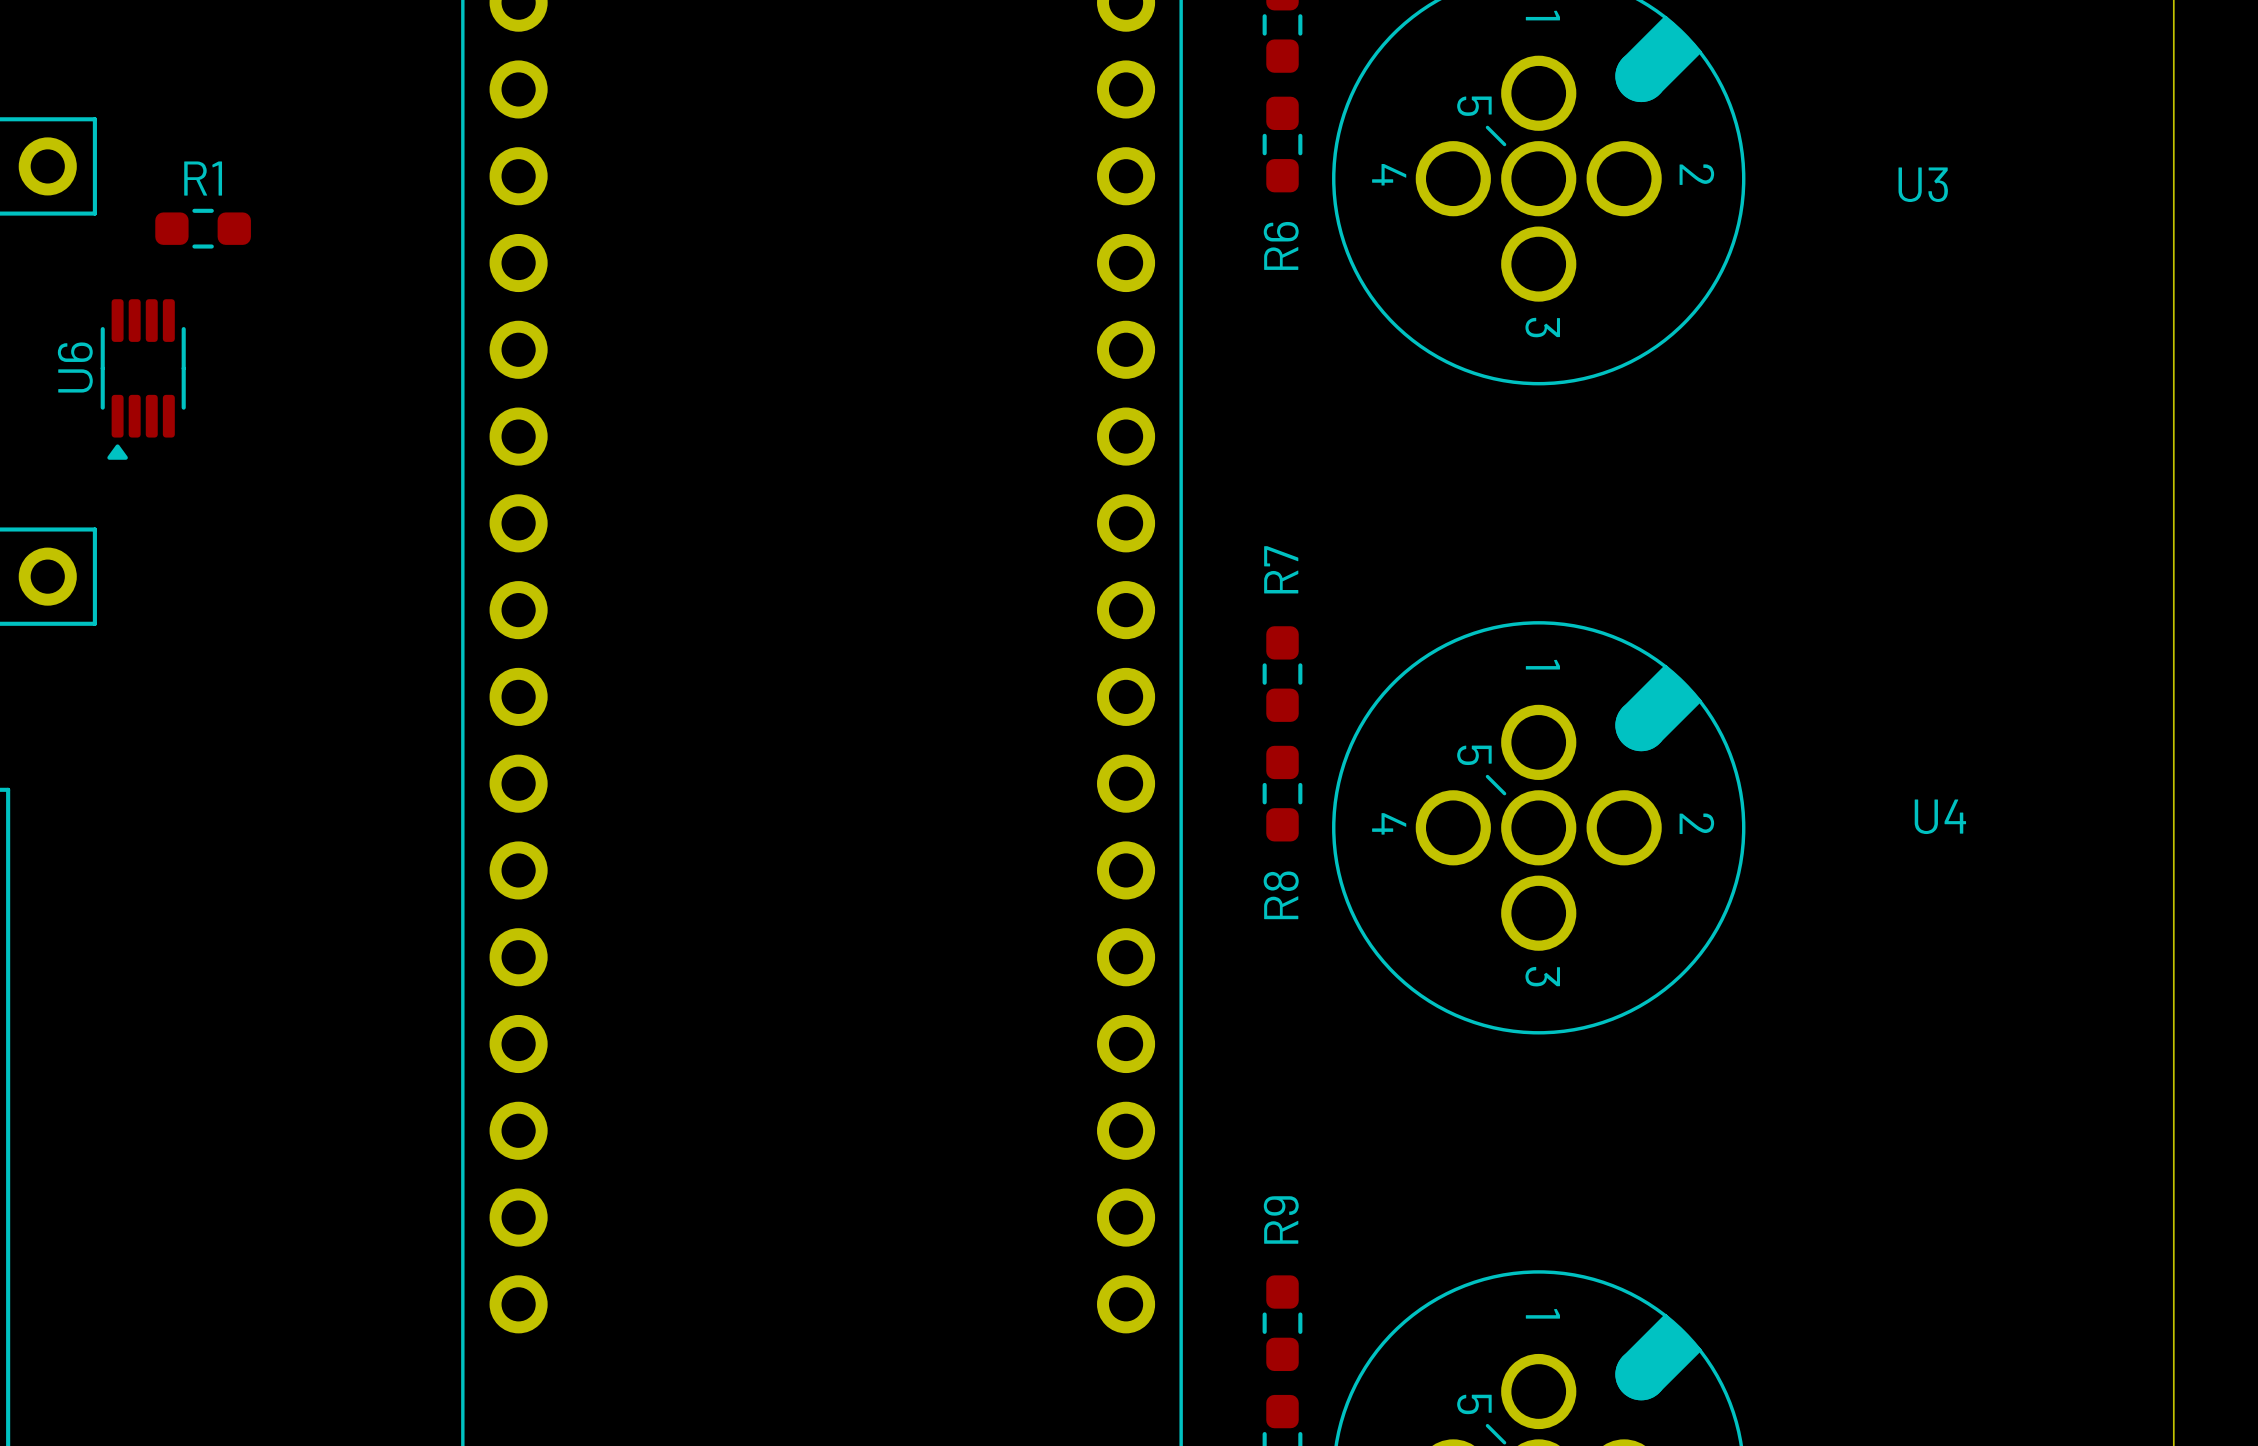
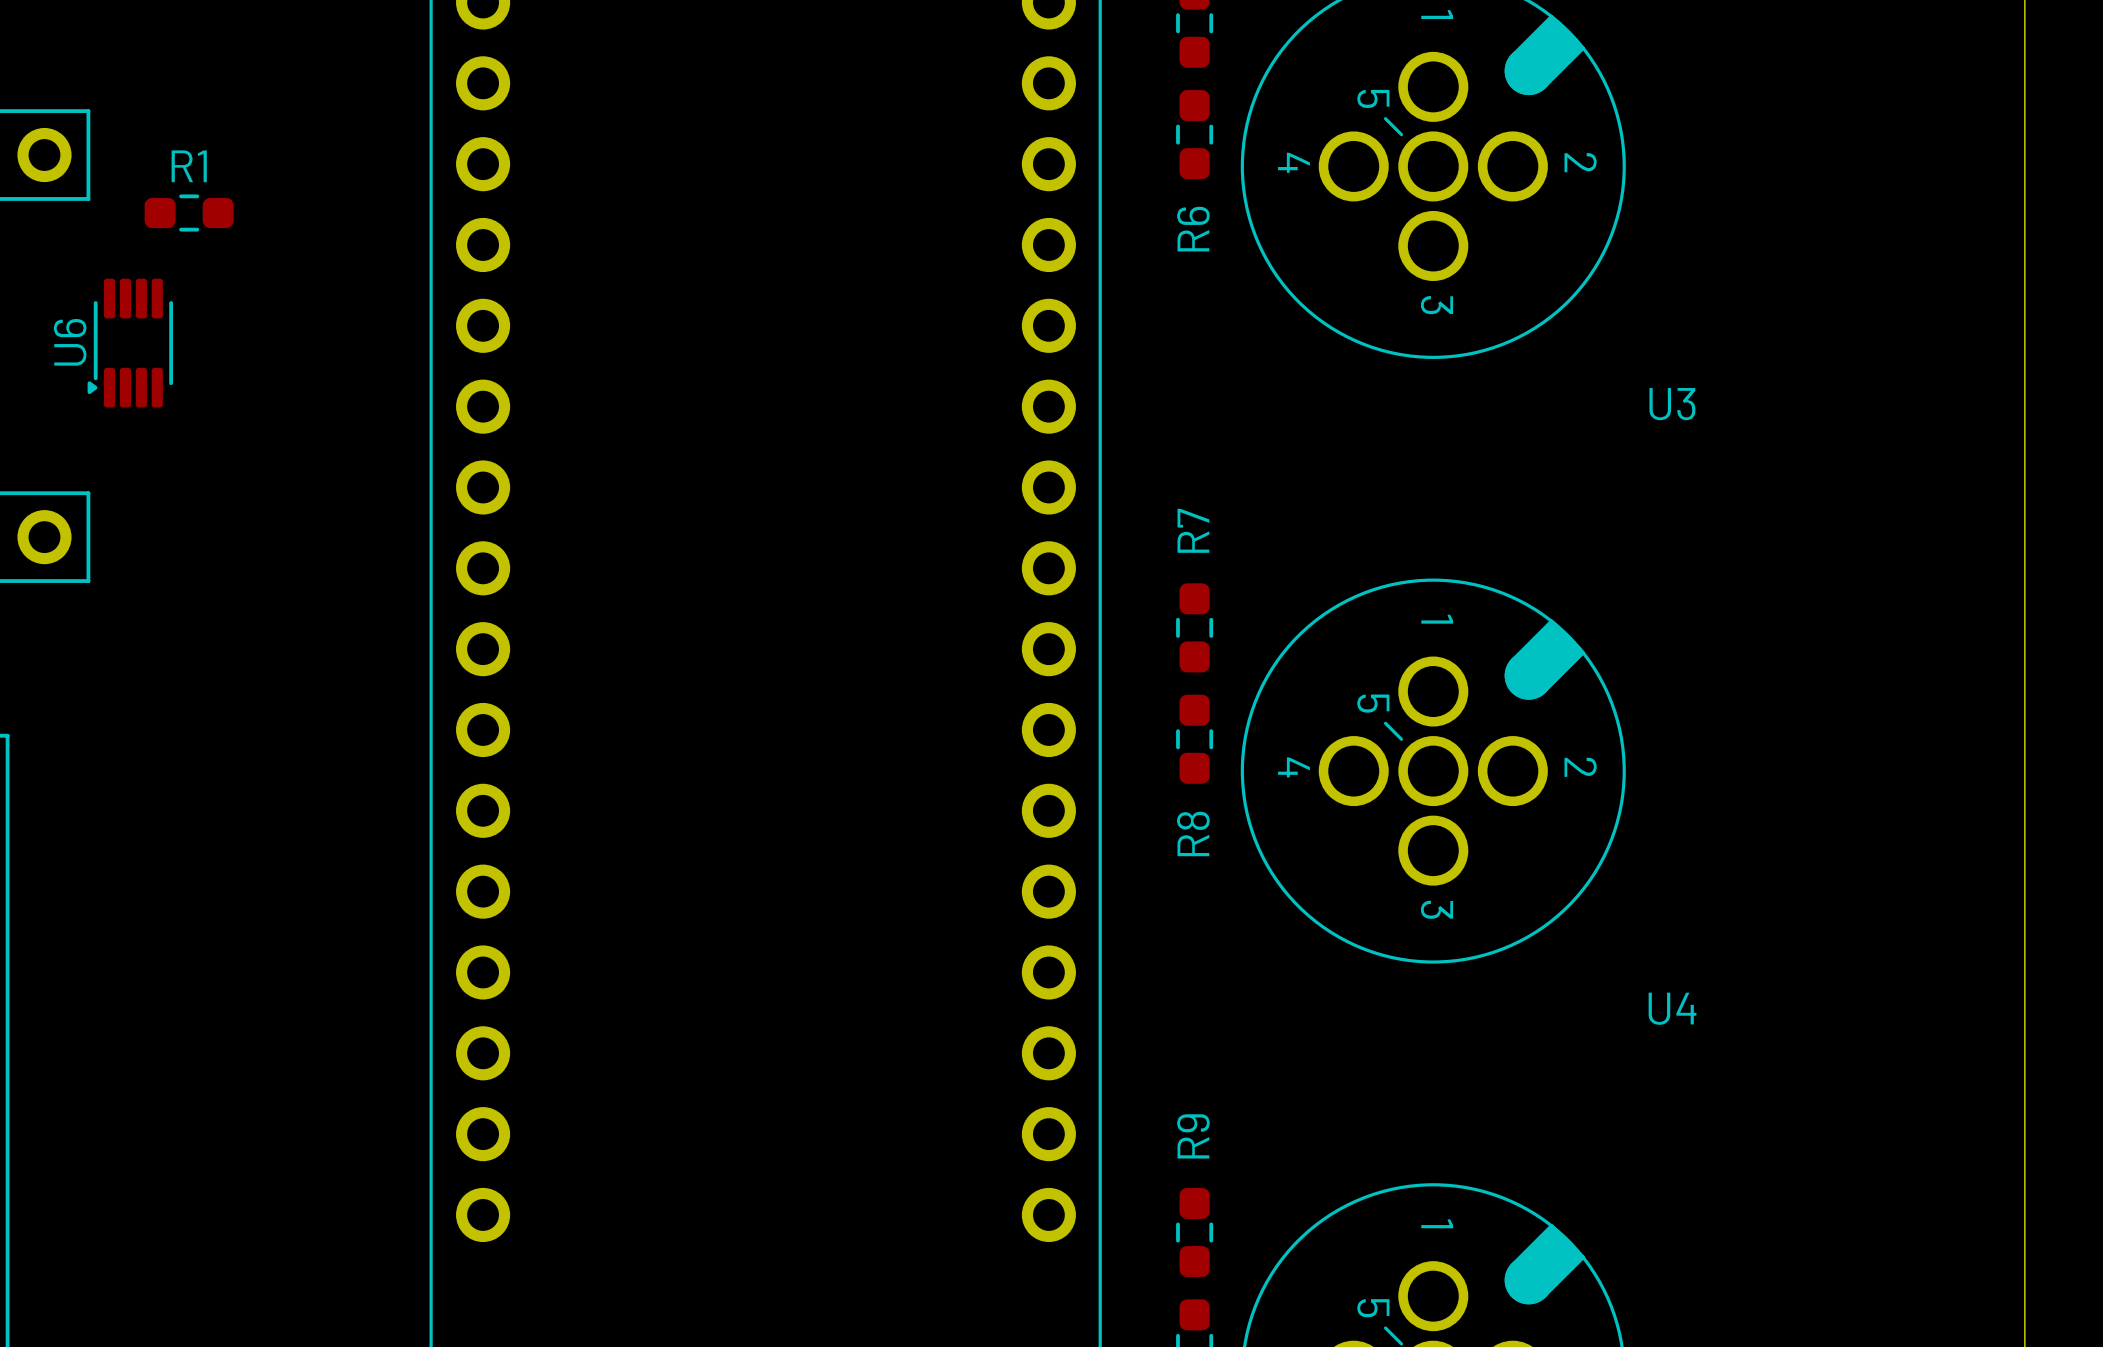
U3 name position: U3 (1923, 184) -> U3 (1672, 404)
U6 footprint: [100, 299, 186, 460] -> [87, 278, 174, 408]
U4 name position: U4 (1940, 816) -> U4 (1672, 1008)

